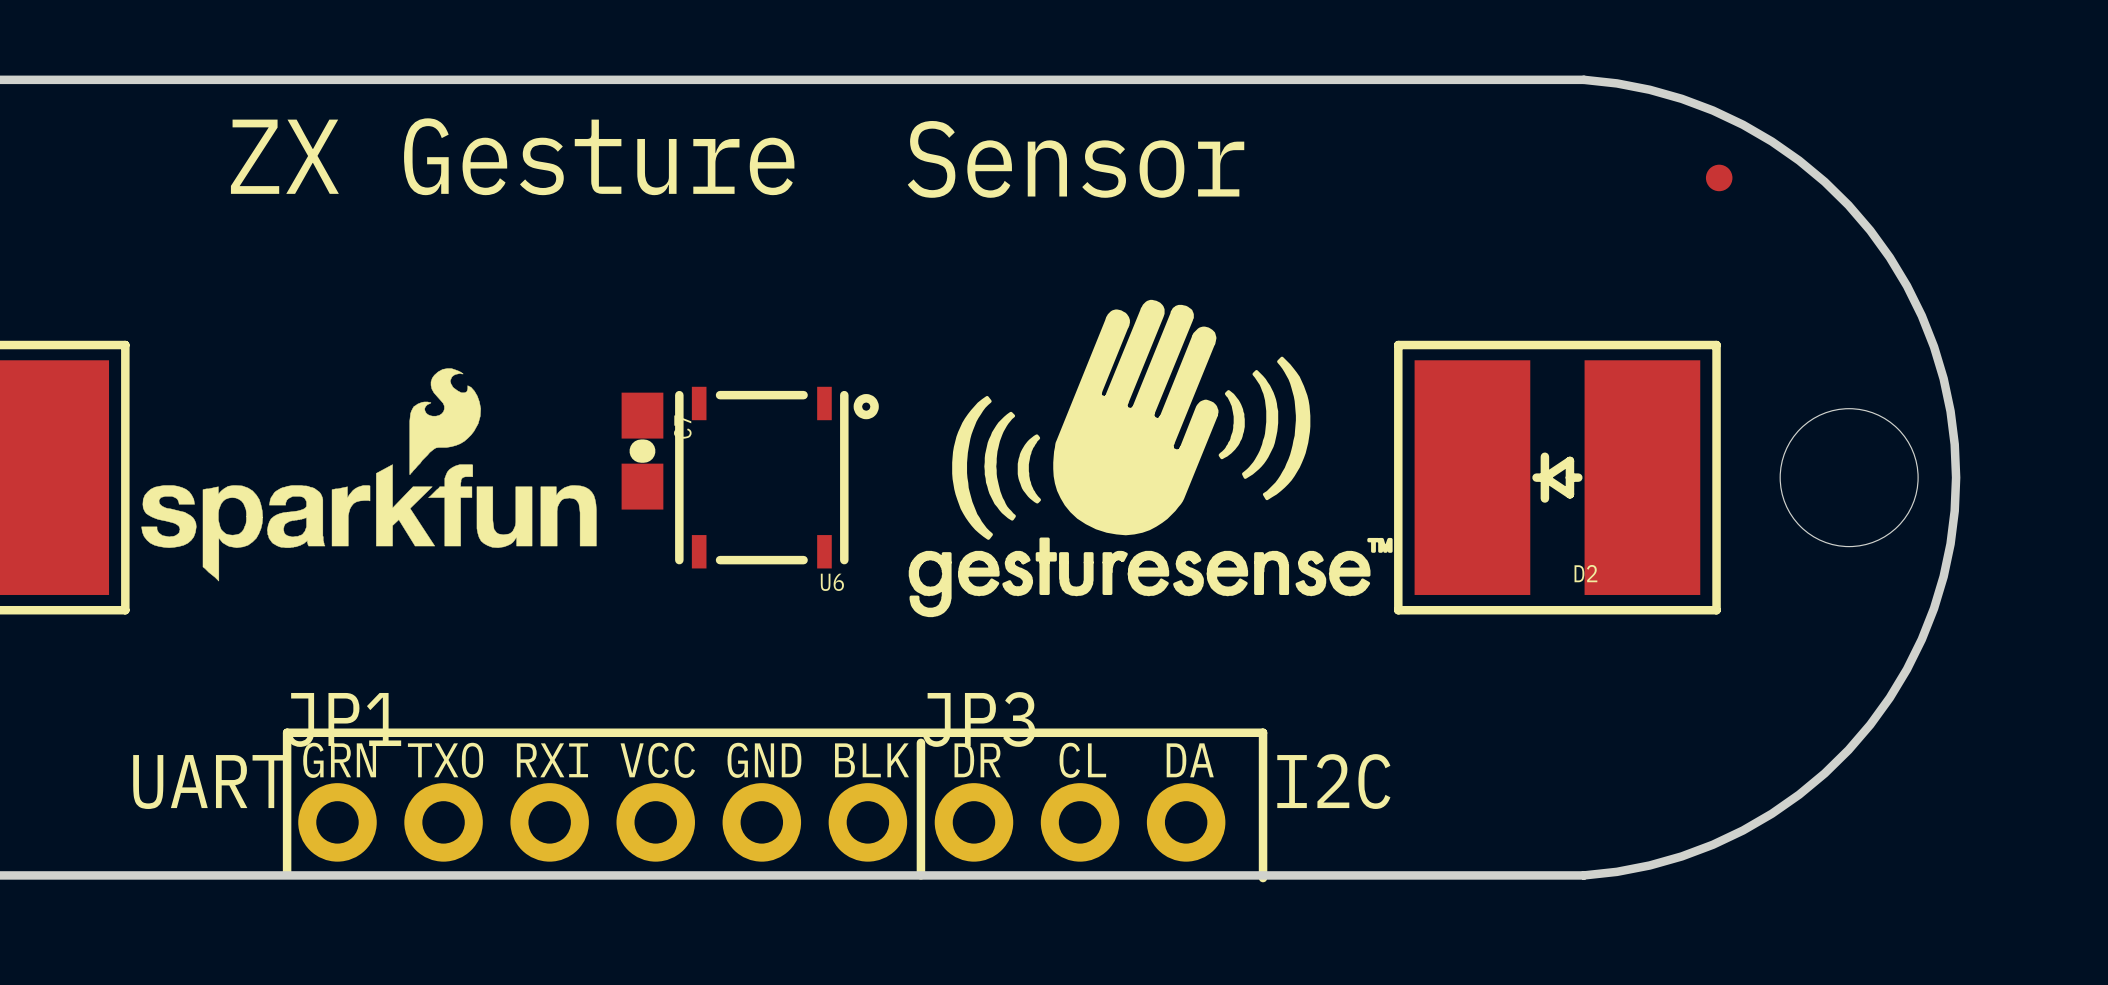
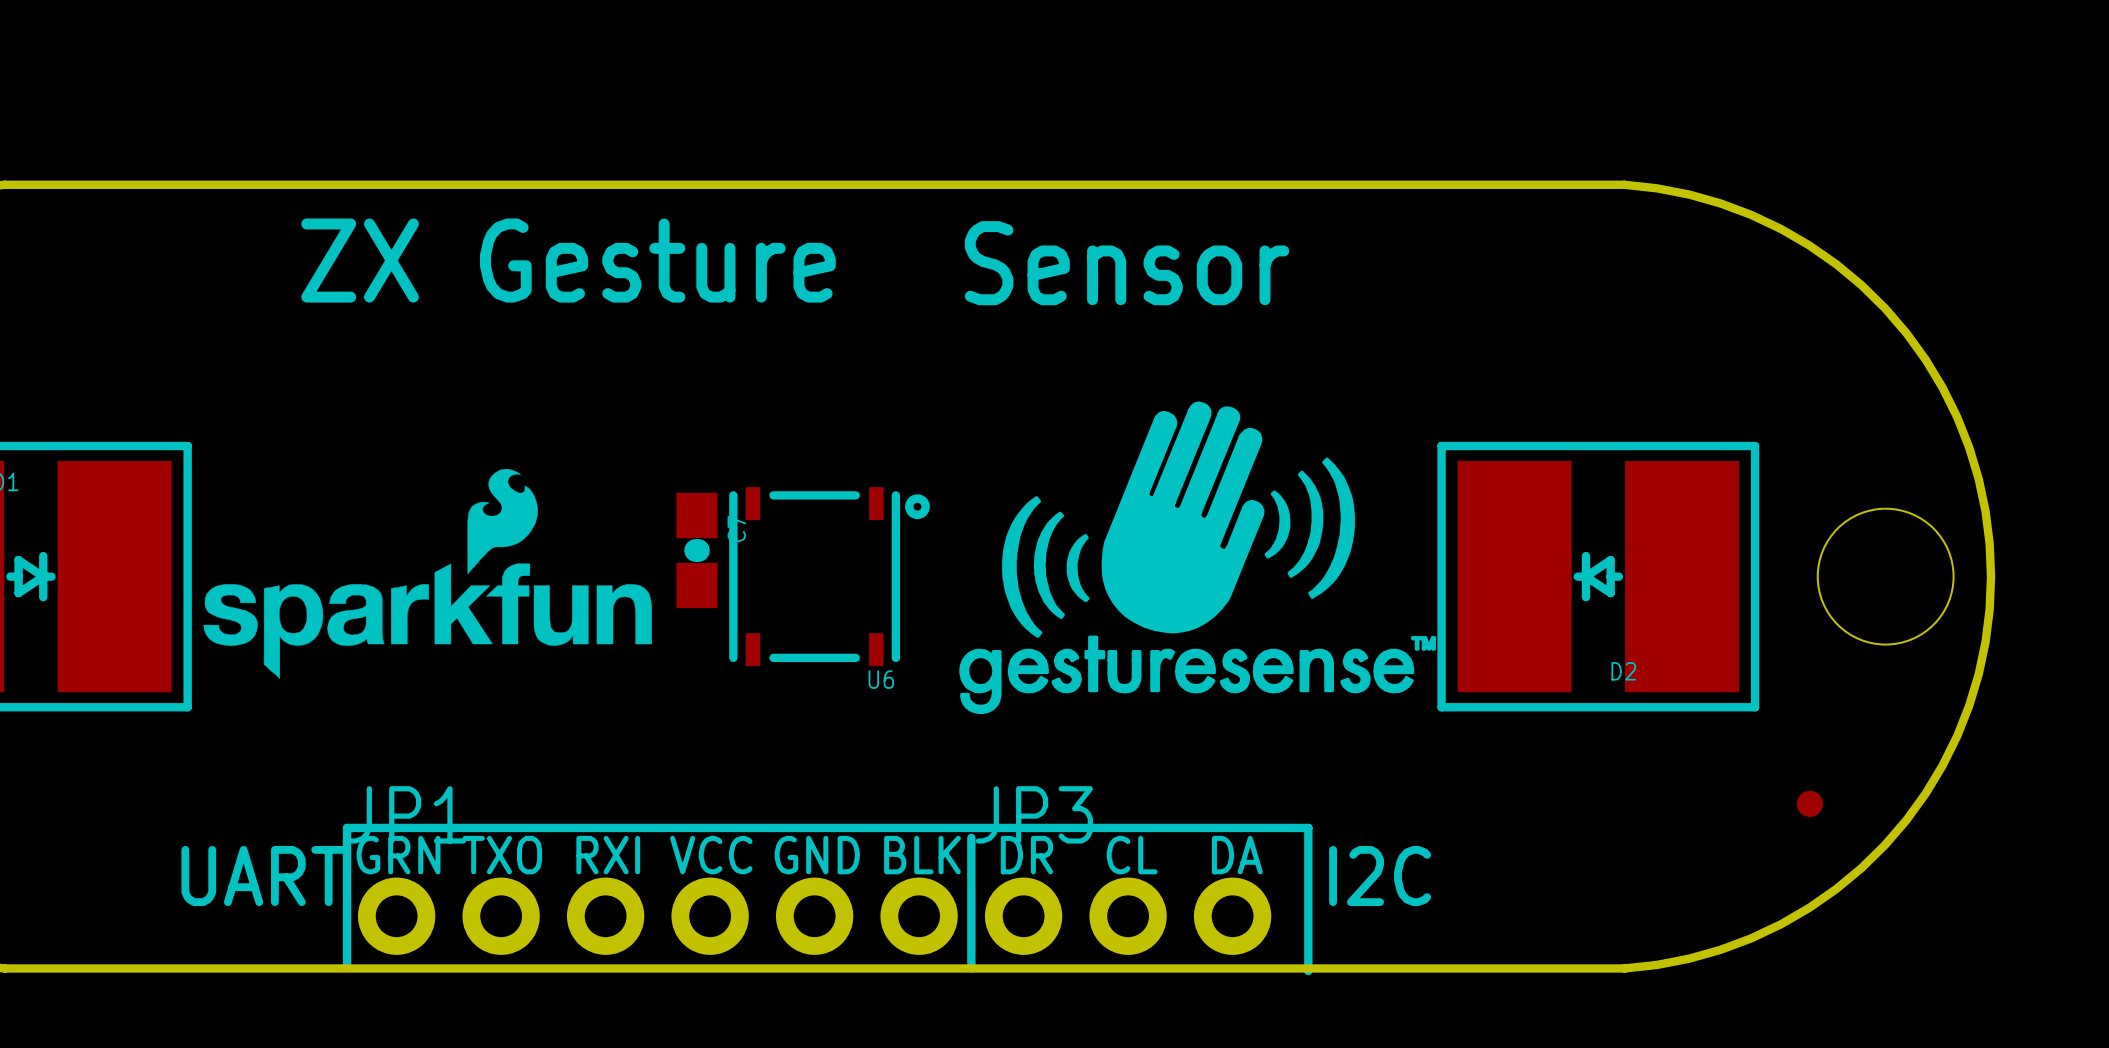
part position: (1719, 177) -> (1809, 803)

